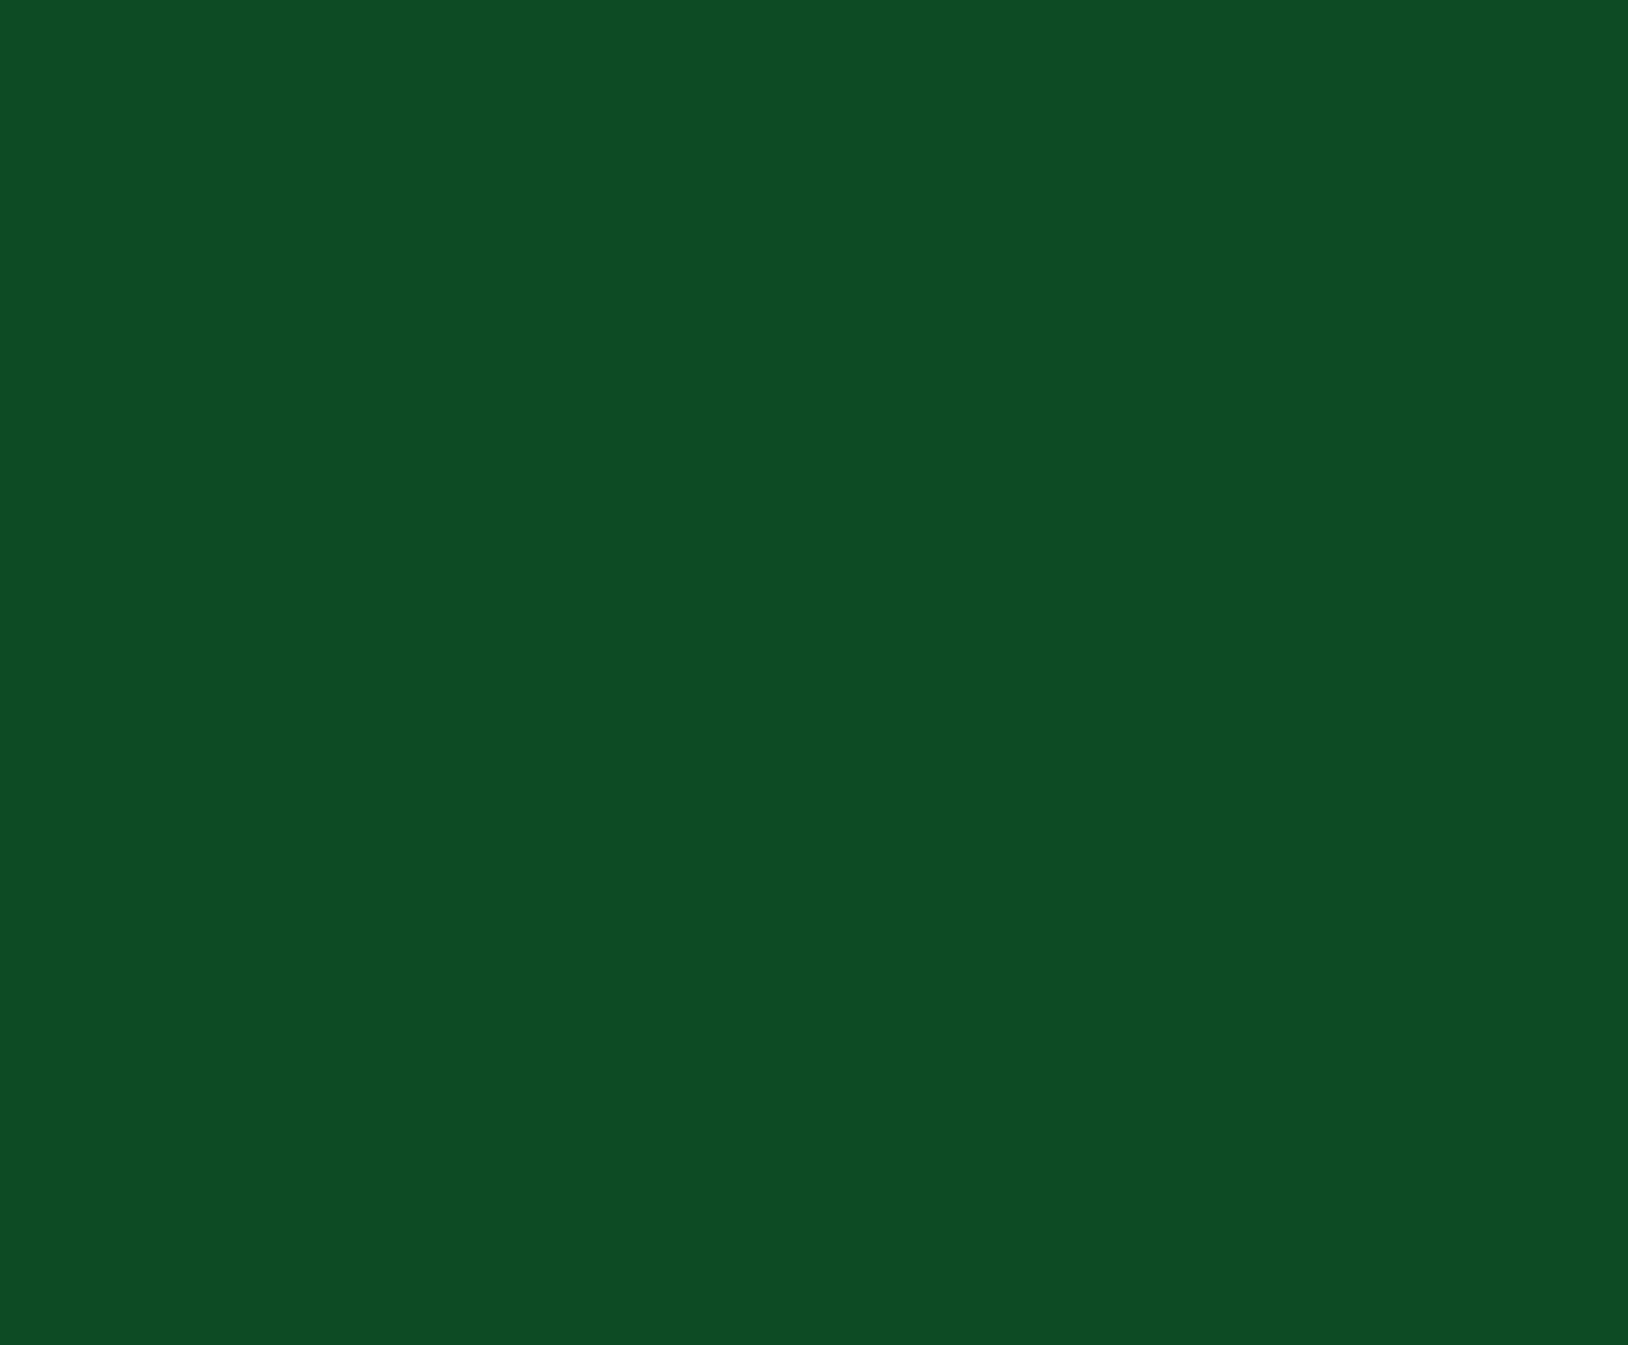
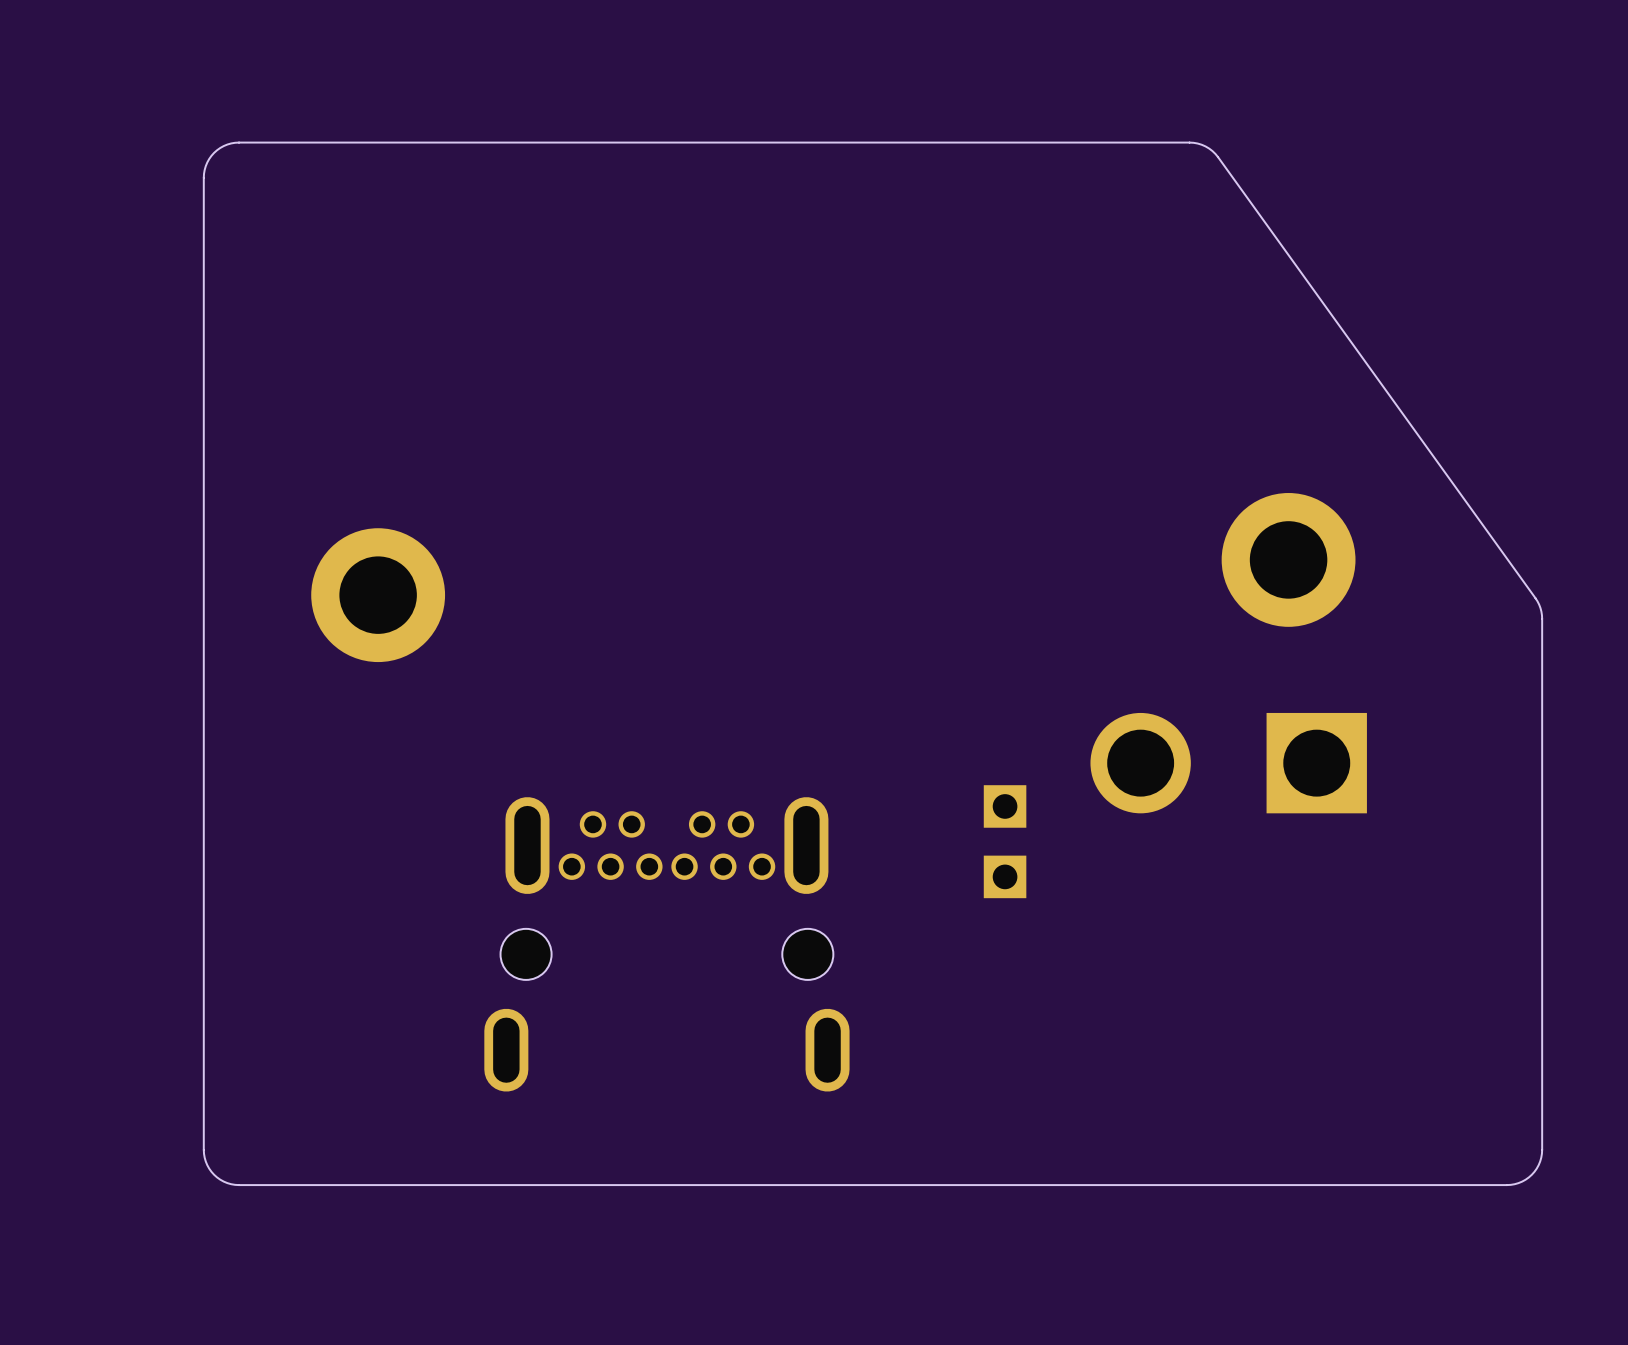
board edge: none -> (1189, 142) (239, 142) (227, 144) (214, 152) (207, 162) (203, 177) (203, 1149) (207, 1165) (214, 1174) (223, 1181) (239, 1185) (1506, 1185) (1518, 1183) (1531, 1174) (1538, 1165) (1542, 1149) (1542, 618) (1540, 608) (1535, 598) (1218, 157) (1205, 146) (1189, 142)
part: none -> (1288, 559)
part: none -> (378, 595)
part: none -> (1175, 805)
part: none -> (666, 944)

